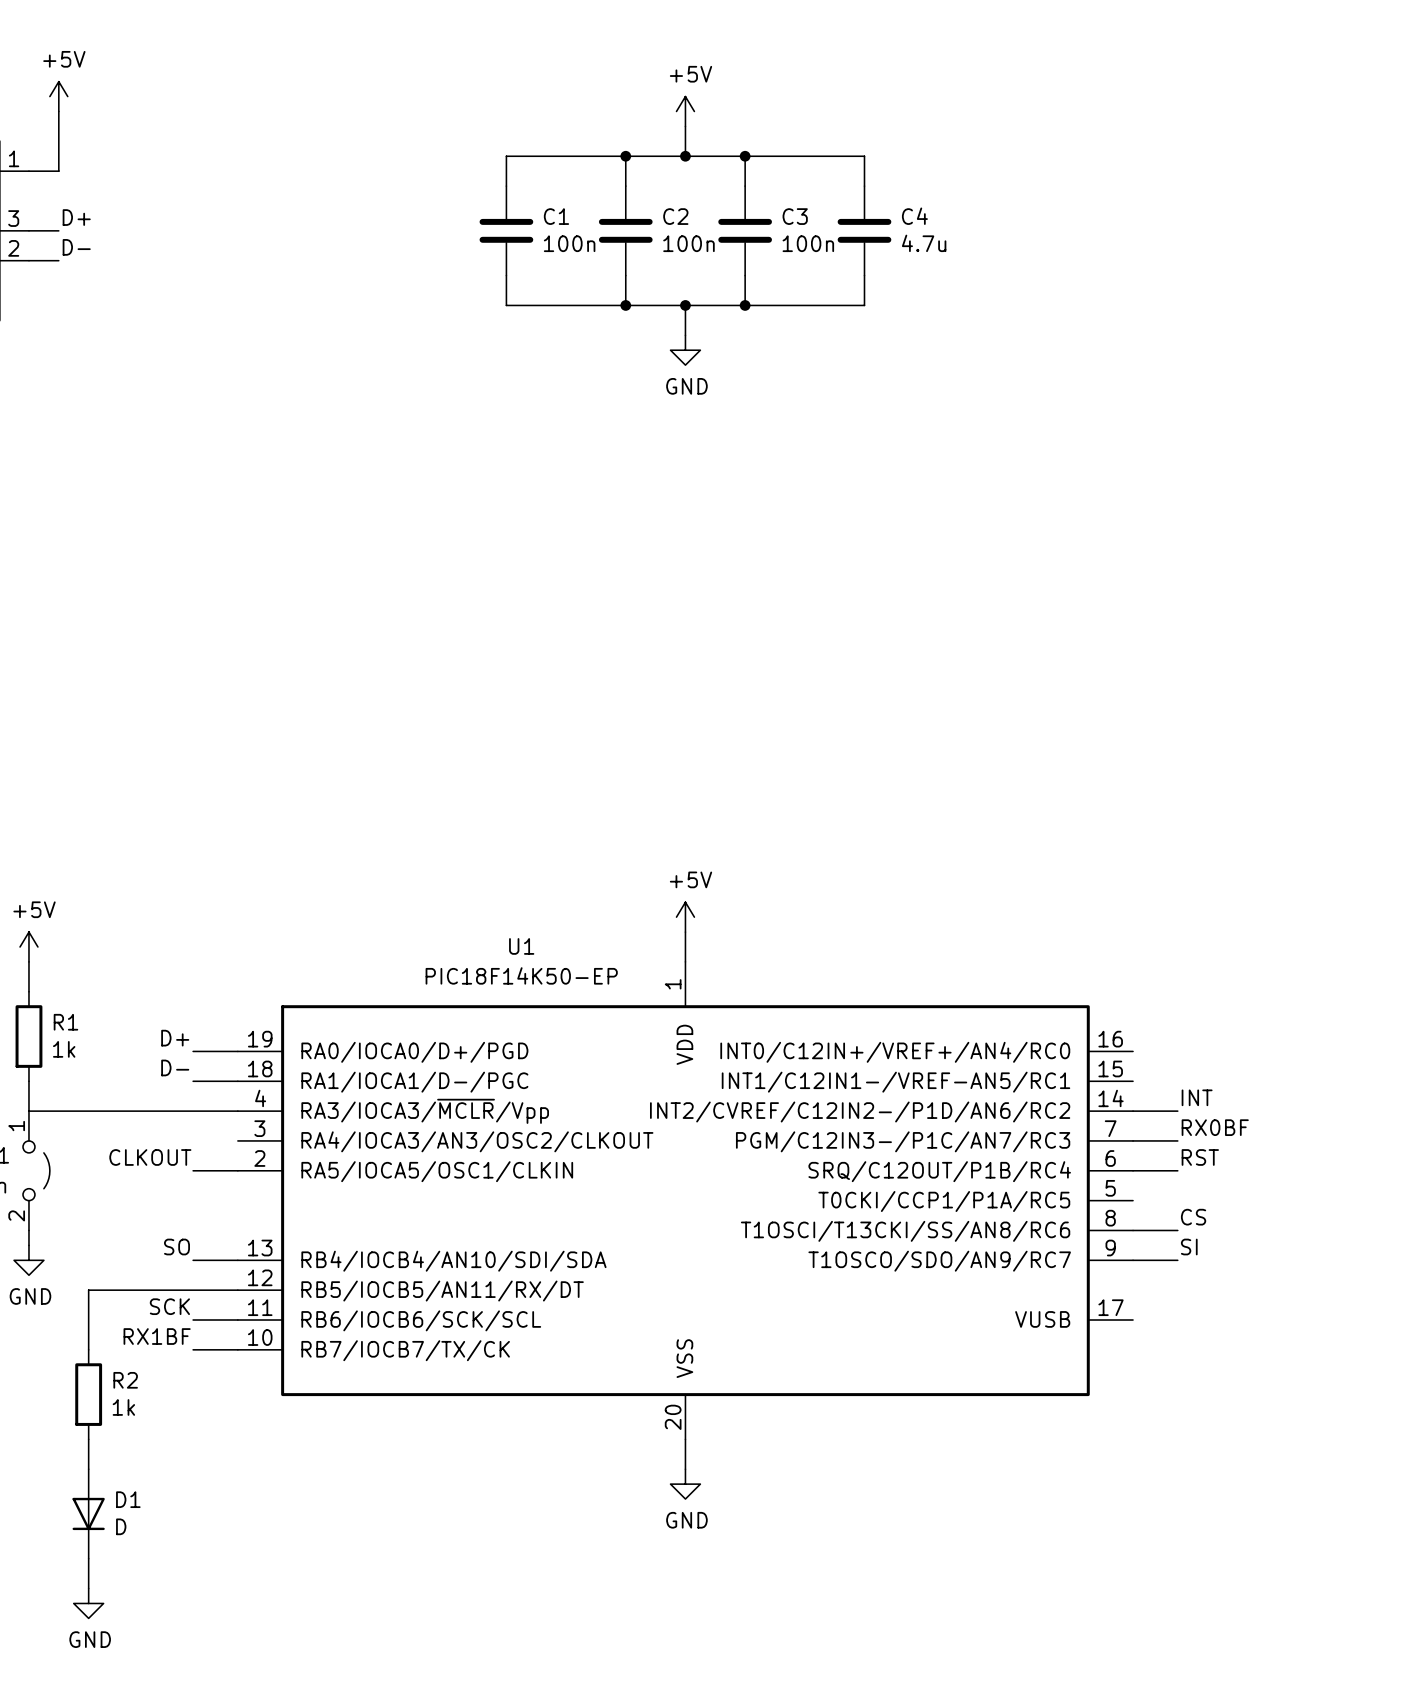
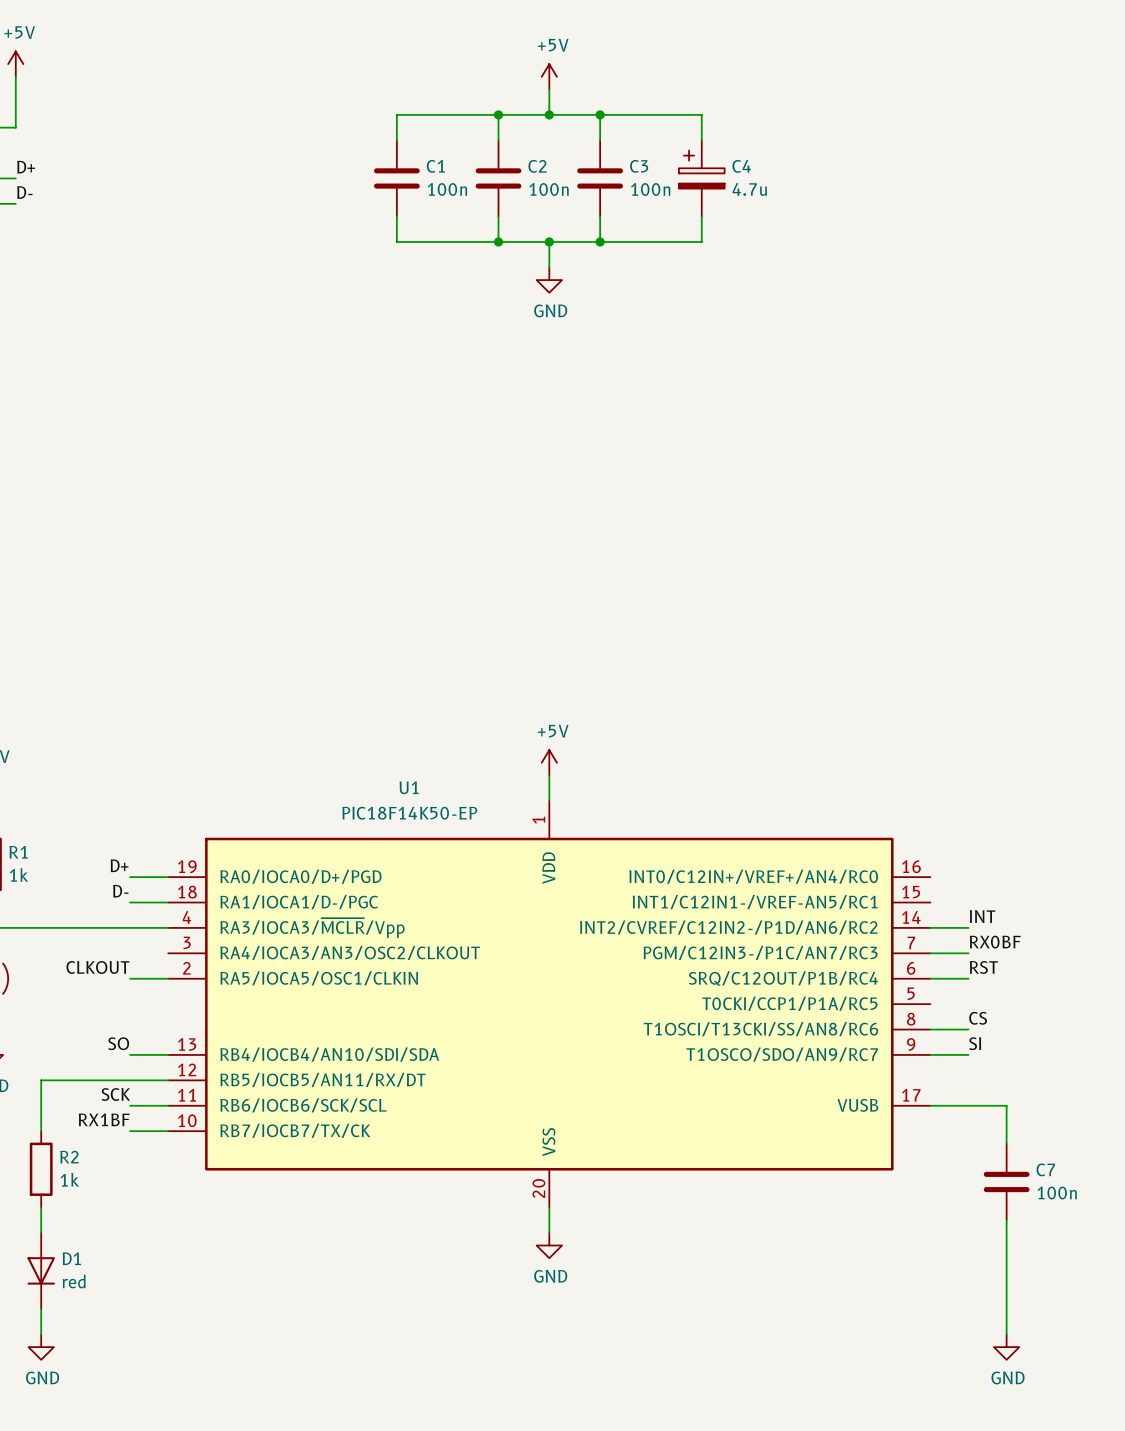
C4 symbol: [837, 186, 892, 276] -> [678, 140, 725, 217]
wire: none -> (930, 1105) (1006, 1105) (1006, 1143)
C7: none -> 100n (1006, 1181)
wire: none -> (1006, 1220) (1006, 1334)
D1 value: D (121, 1526) -> red (74, 1281)
power symbol: none -> GND (1006, 1347)

